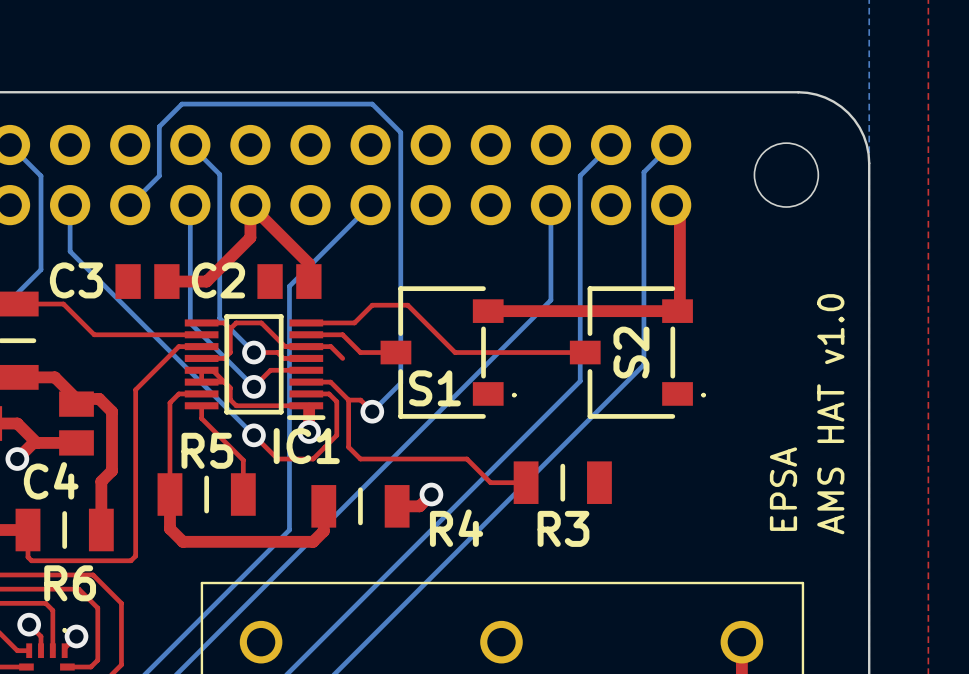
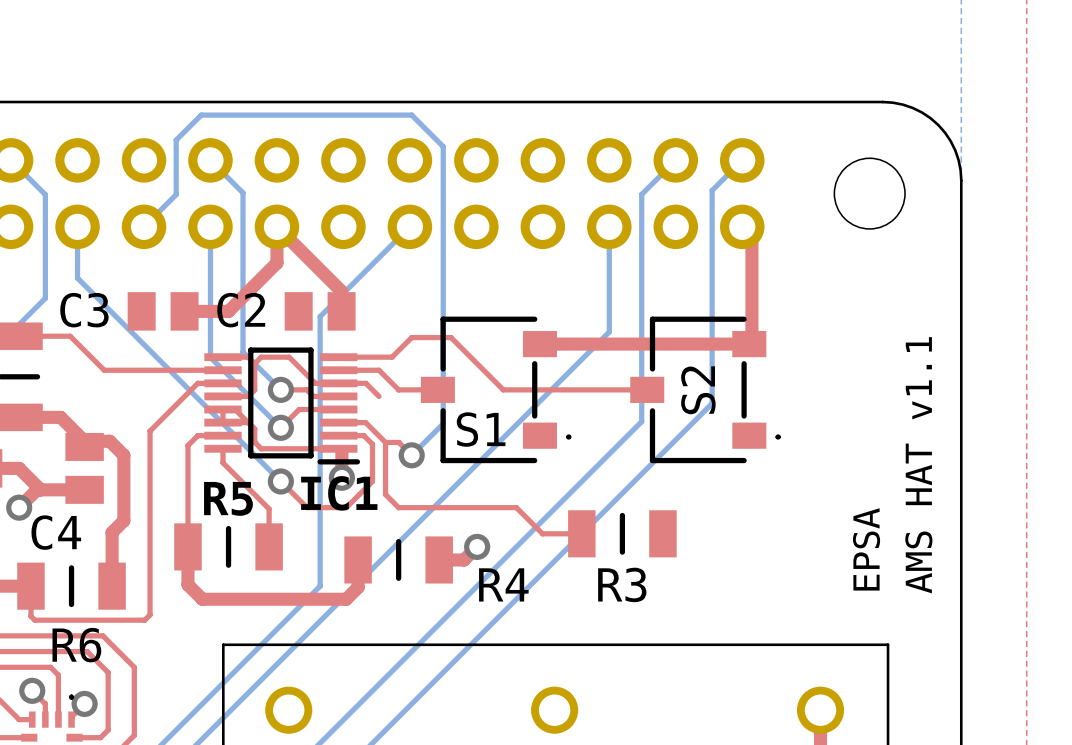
text: AMS HAT v1.0 (830, 414) -> AMS HAT v1.1 (918, 465)

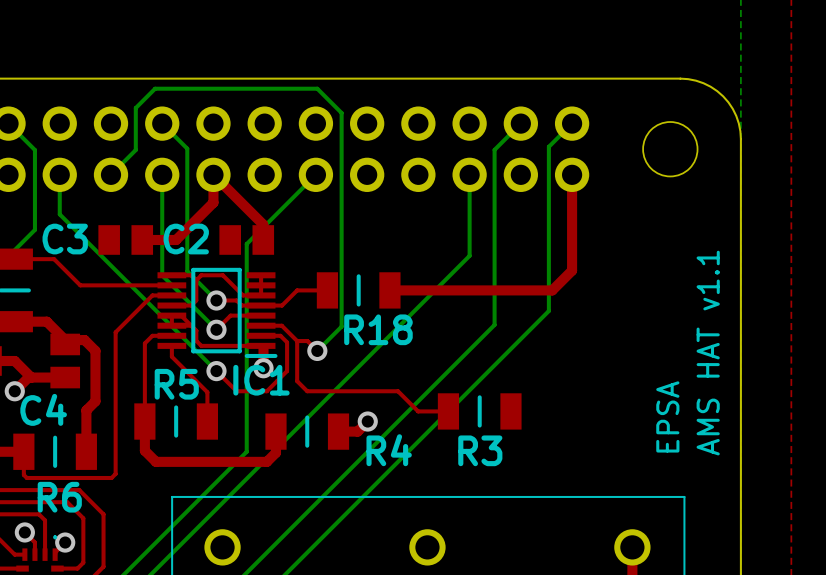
top track: (742, 226) (751, 236) (751, 341) (749, 344) (539, 344) -> (572, 174) (572, 270) (552, 290) (389, 290)
top track: (338, 357) (392, 357) (411, 337) (450, 337) (503, 389) (647, 389) -> none
top track: (338, 370) (379, 370) (398, 389) (437, 389) -> none
top track: none -> (327, 290) (297, 290) (282, 305) (261, 305)
R18: none -> (358, 290)
top track: (338, 383) (365, 383) (379, 396) -> (261, 295) (261, 275)
S1: (496, 389) -> none
S2: (705, 389) -> none

